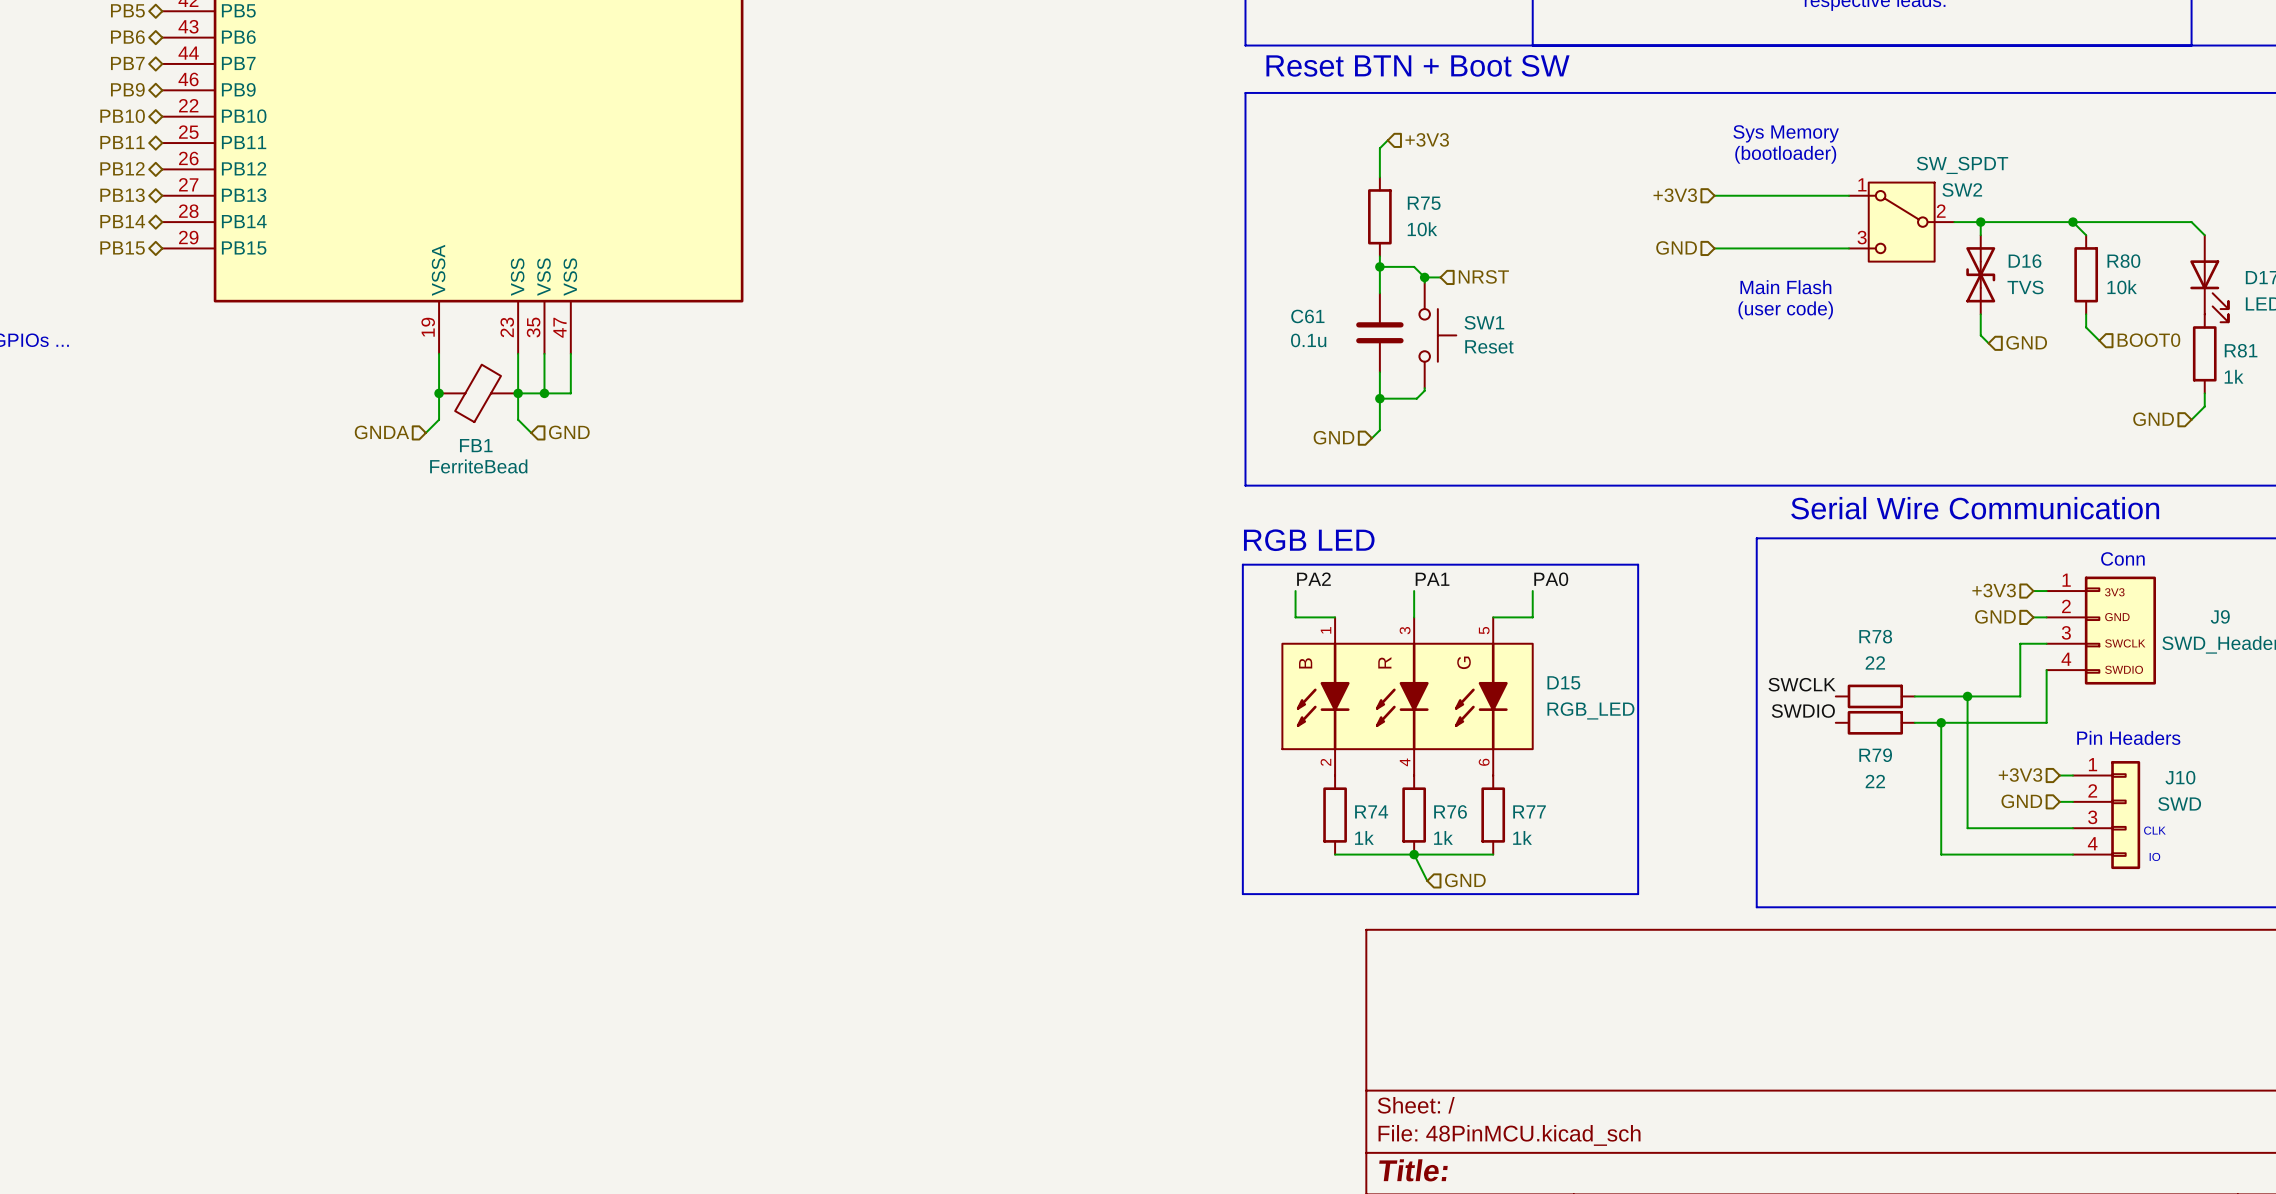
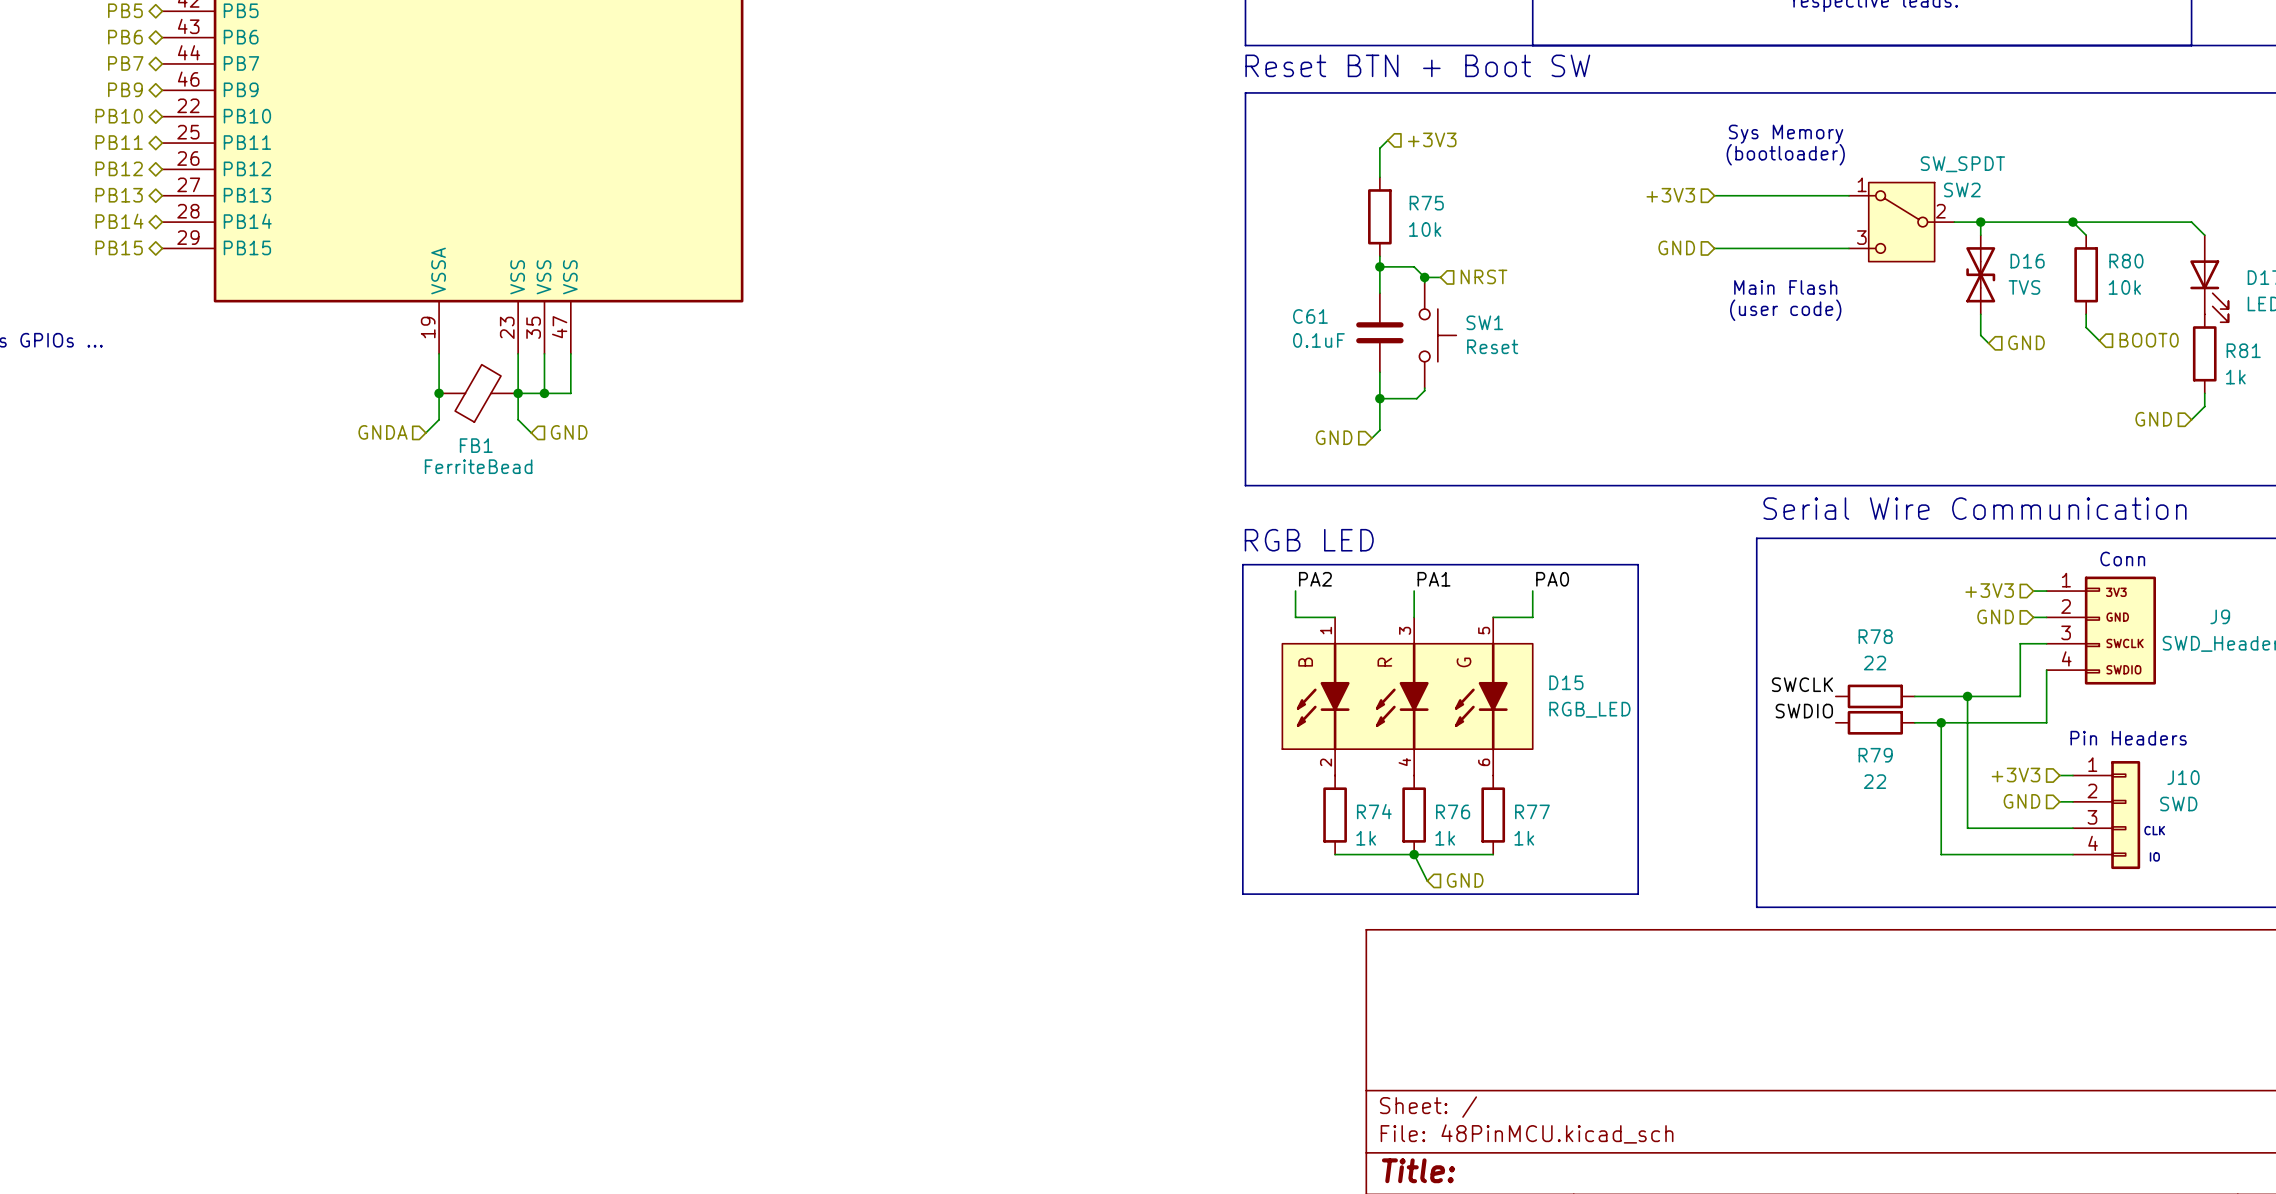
C61 value: 0.1u (1308, 340) -> 0.1uF (1318, 340)

